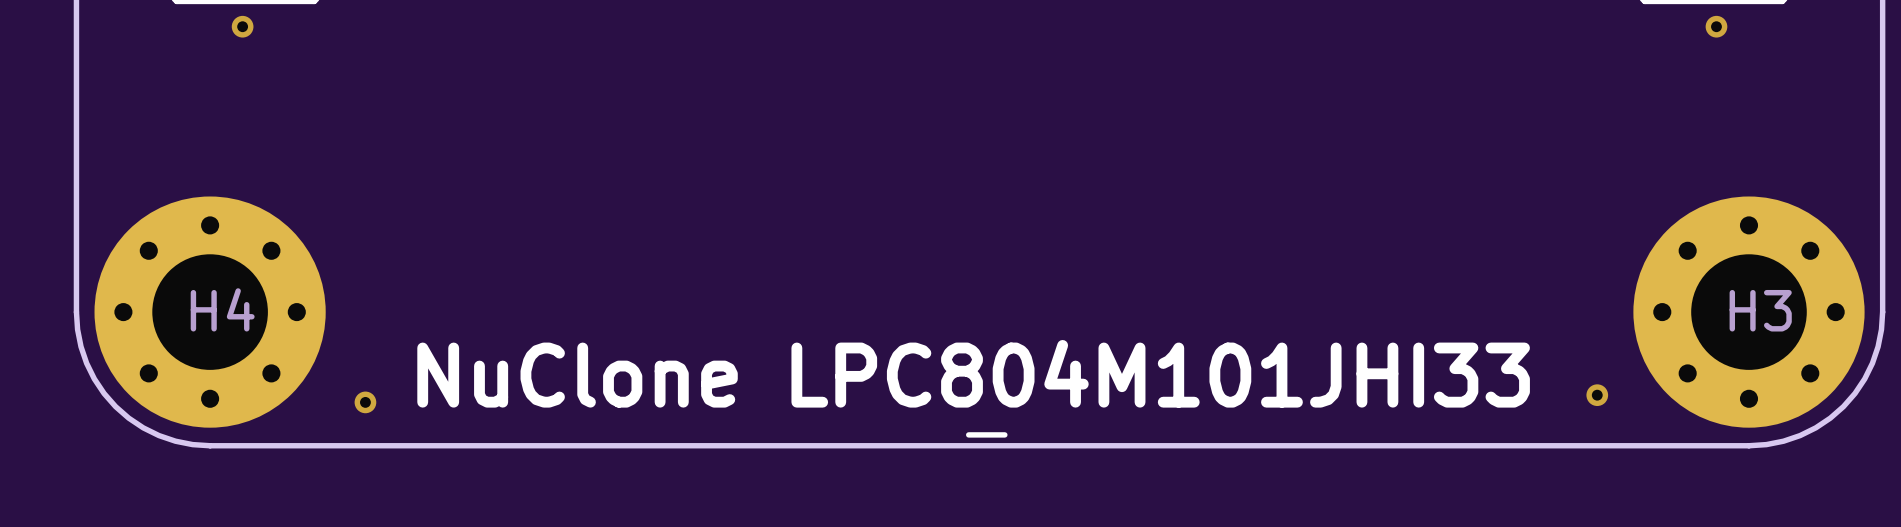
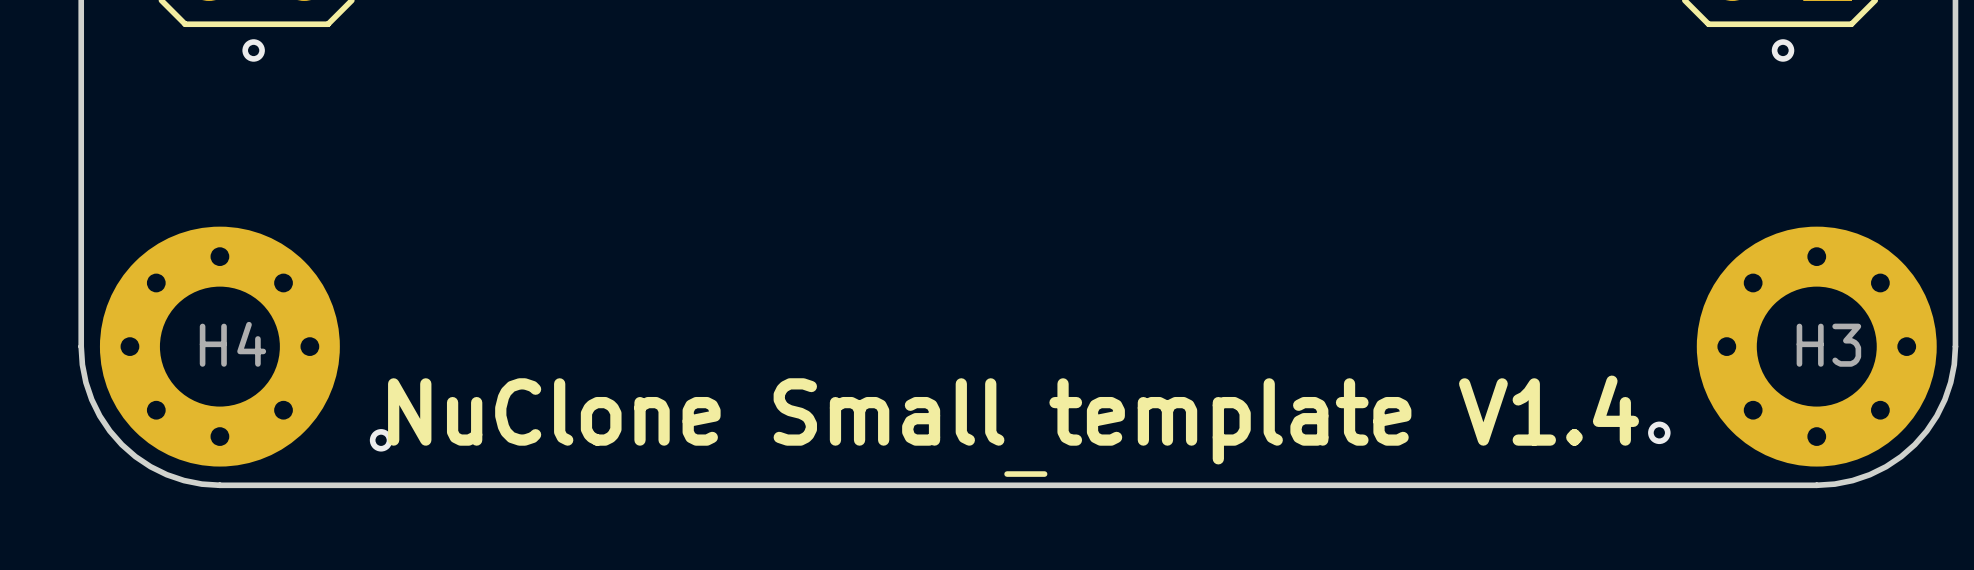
drawing shape: [417, 339, 1530, 438] -> [388, 375, 1639, 477]

